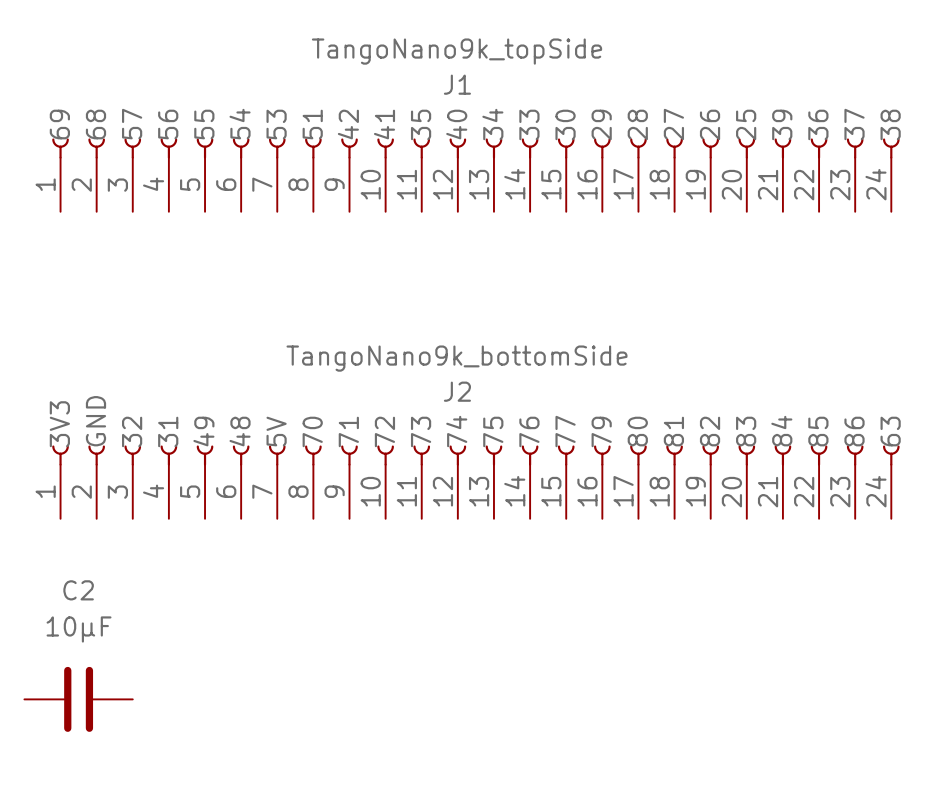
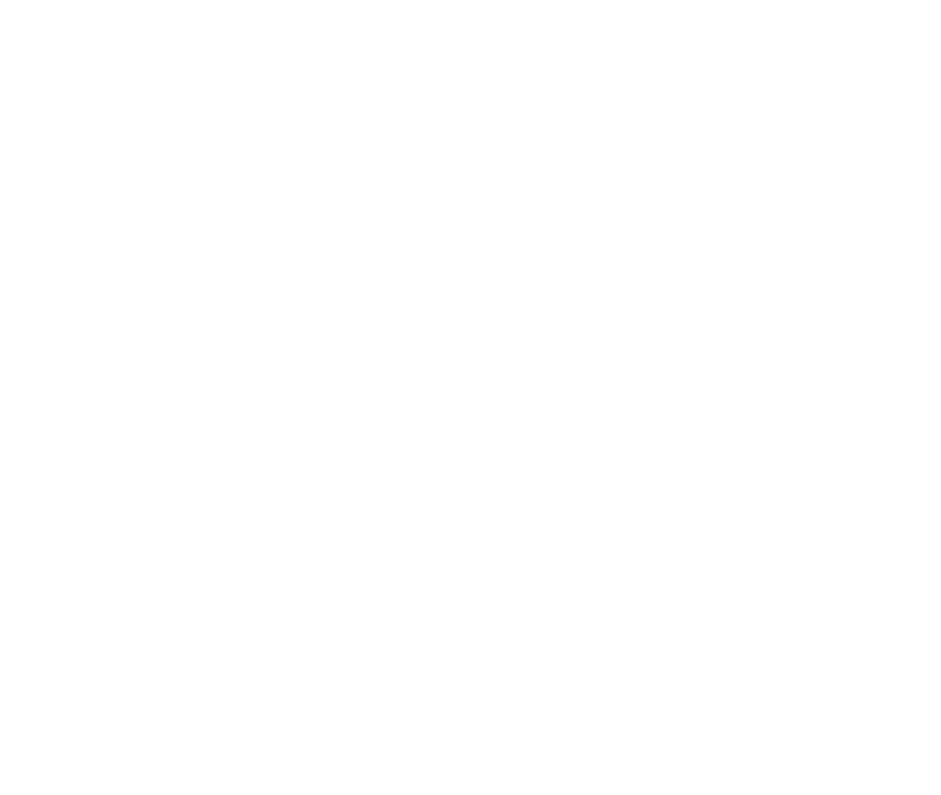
J1: TangoNano9k_topSide (475, 175) -> none
J2: TangoNano9k_bottomSide (475, 482) -> none
C2: 10µF (78, 699) -> none

